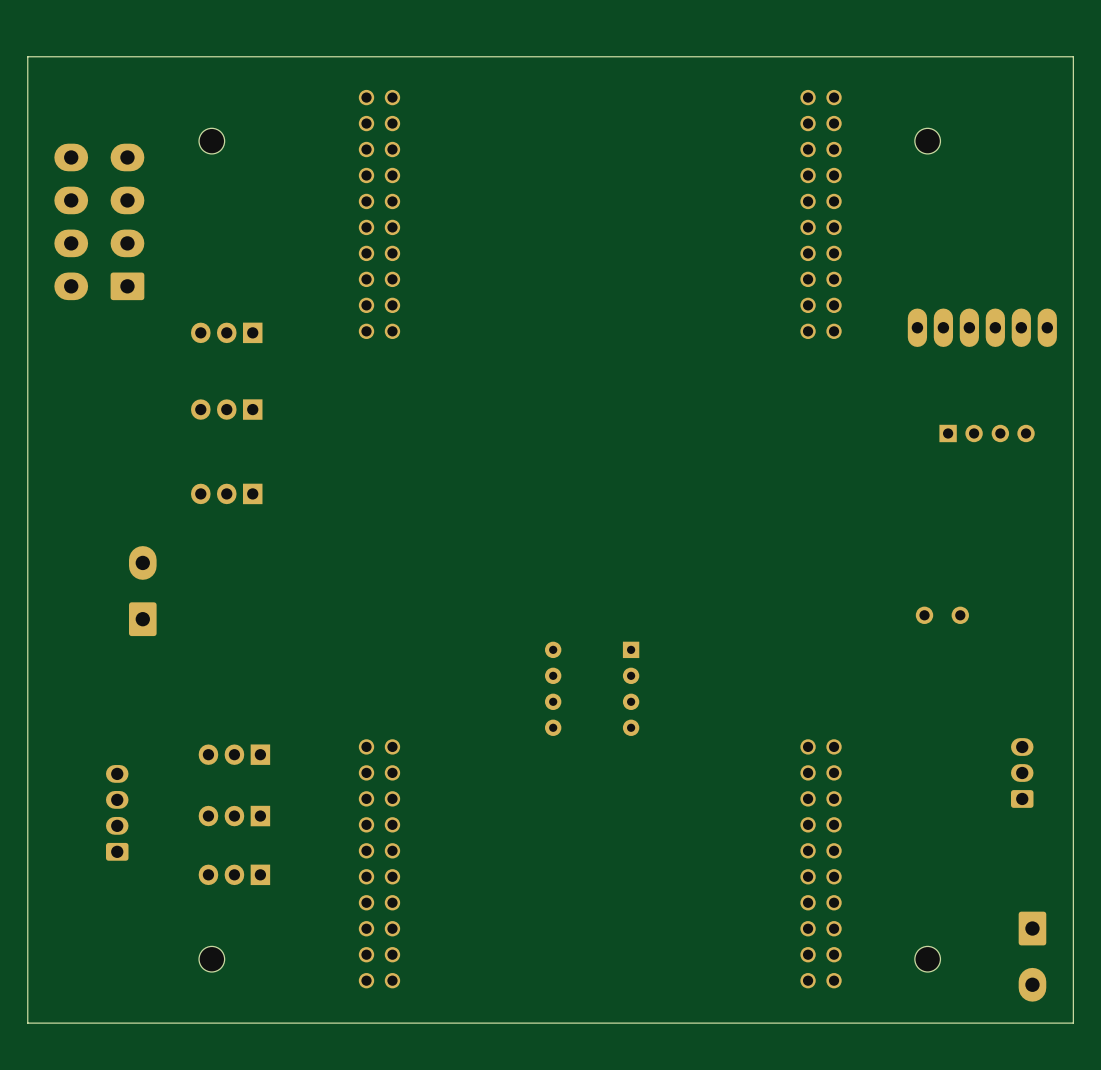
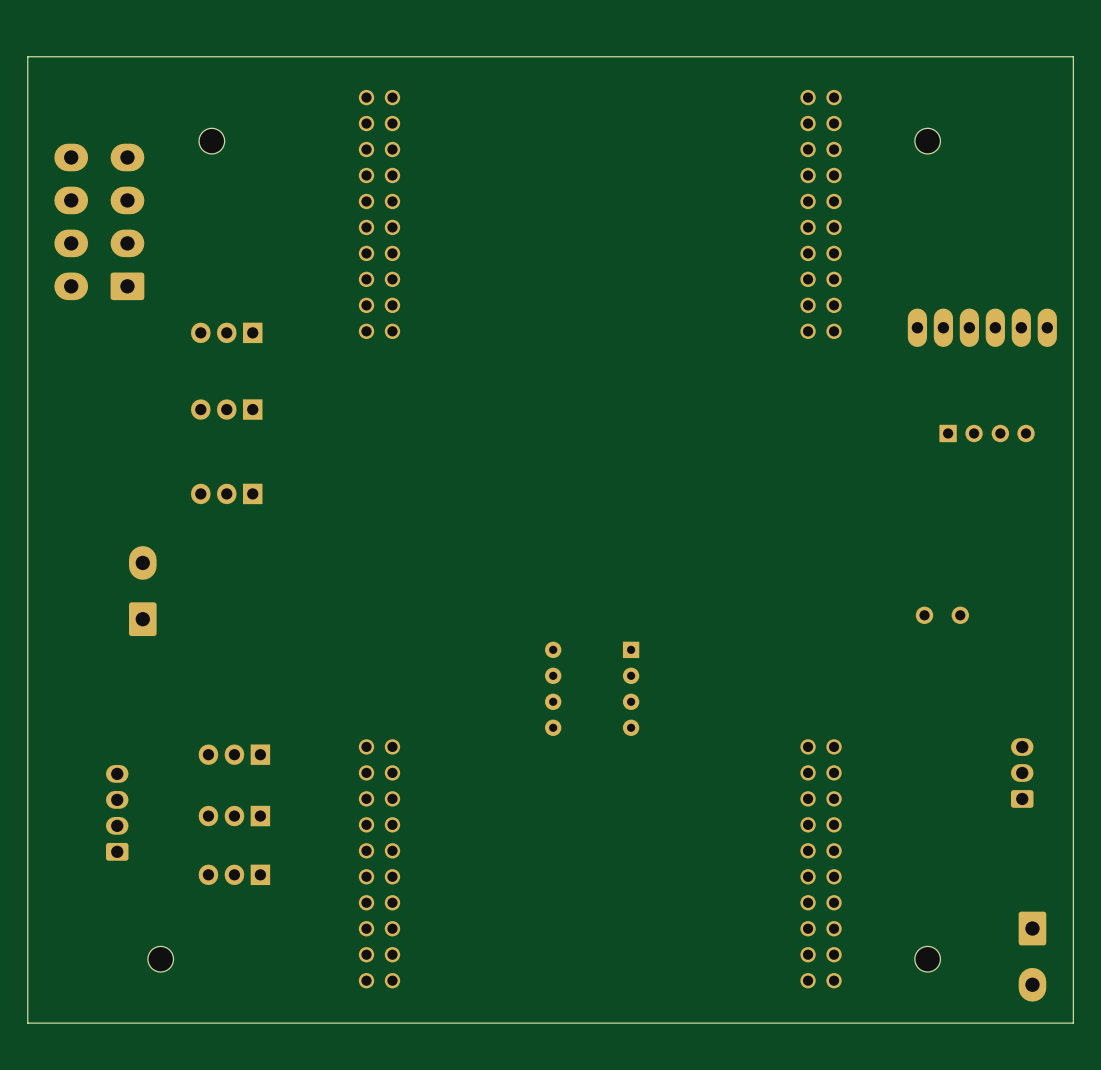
part position: (211, 959) -> (160, 959)

